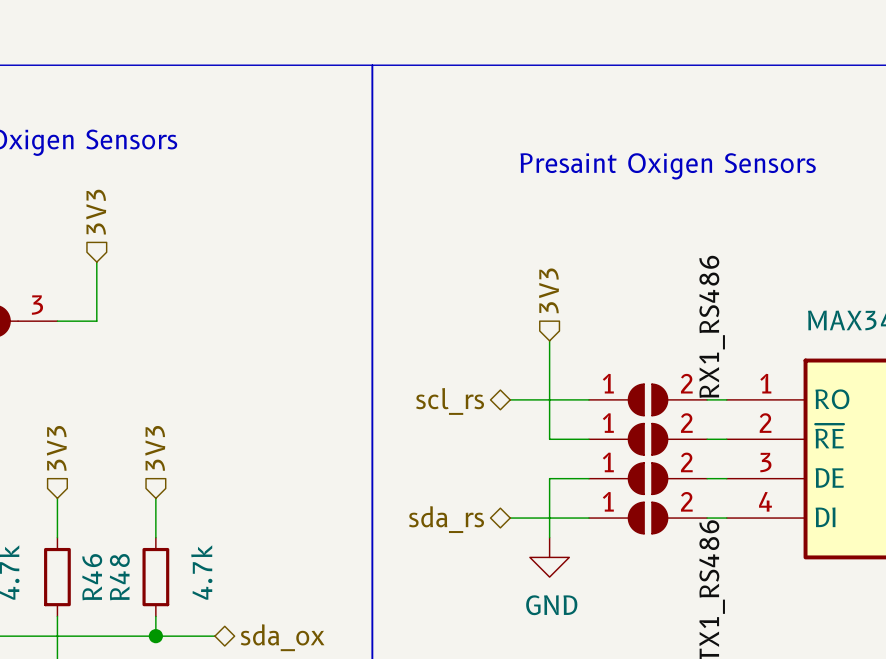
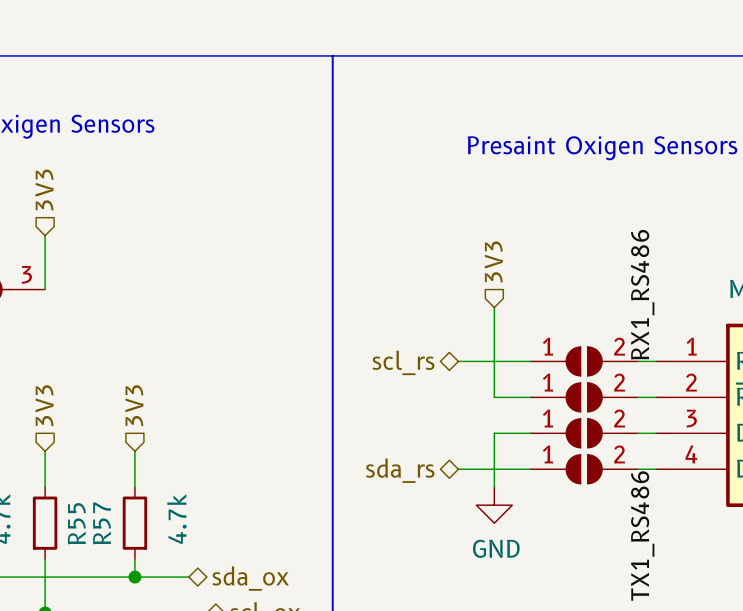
hierarchical label position: 3V3 (96, 212) -> 3V3 (44, 190)
wire: (96, 262) (96, 321) (57, 321) -> (45, 235) (45, 289)
R46 name: R46 (92, 577) -> R55 (76, 523)
R48 name: R48 (119, 577) -> R57 (101, 523)

